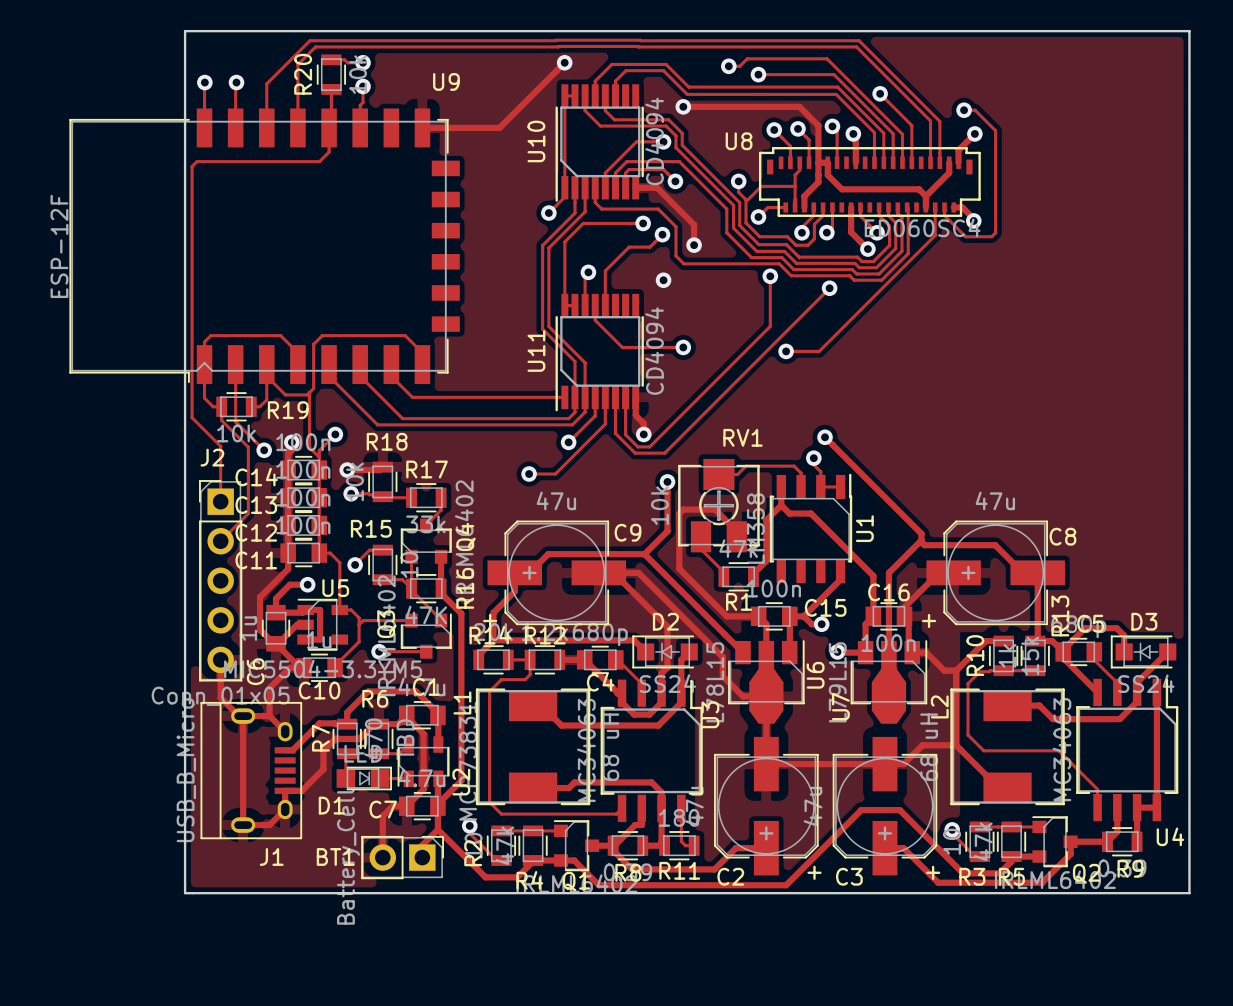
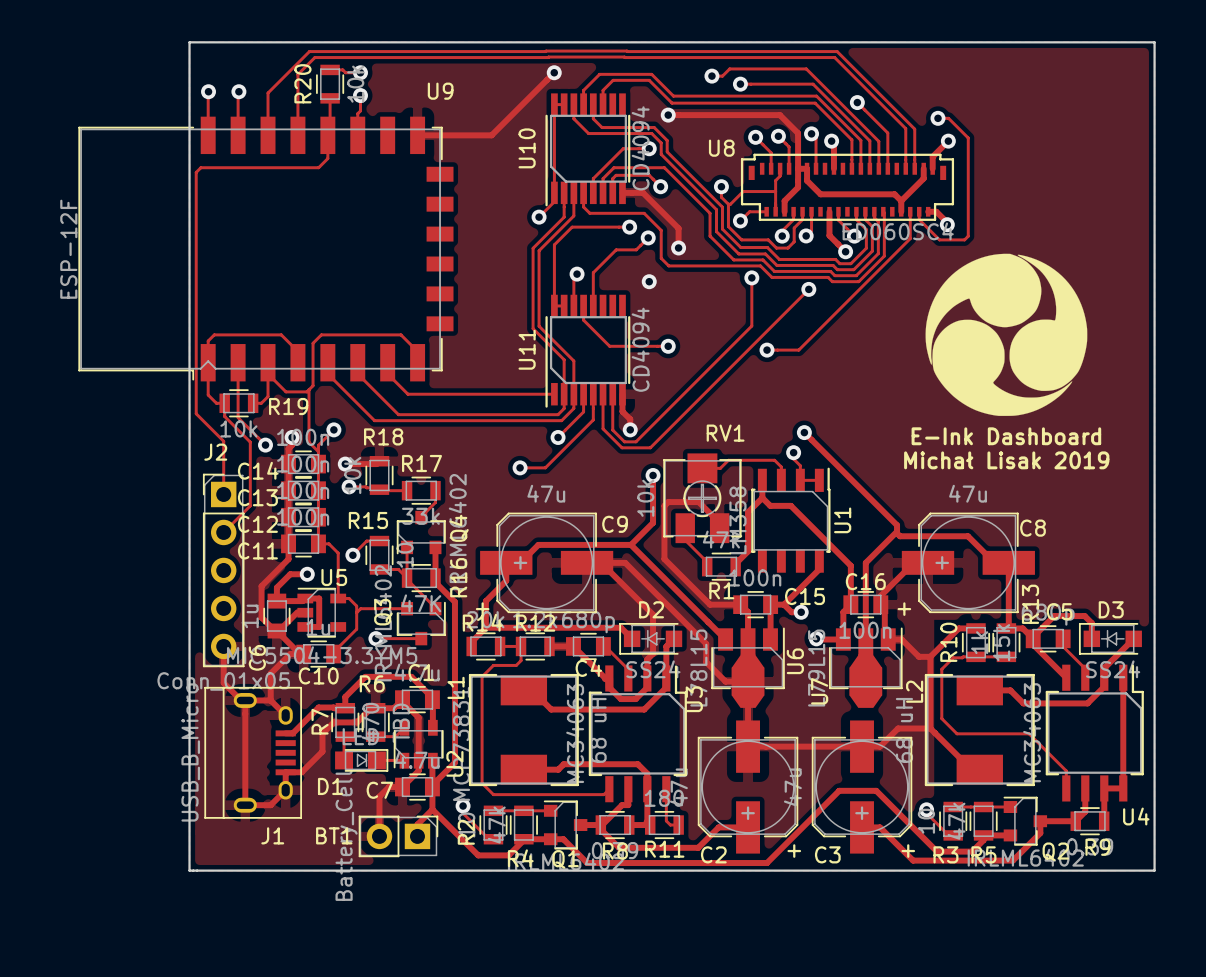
drawing: none -> [925, 253, 1088, 416]
text: none -> E-Ink Dashboard (1006, 436)
text: none -> Michał Lisak 2019 (1006, 460)

